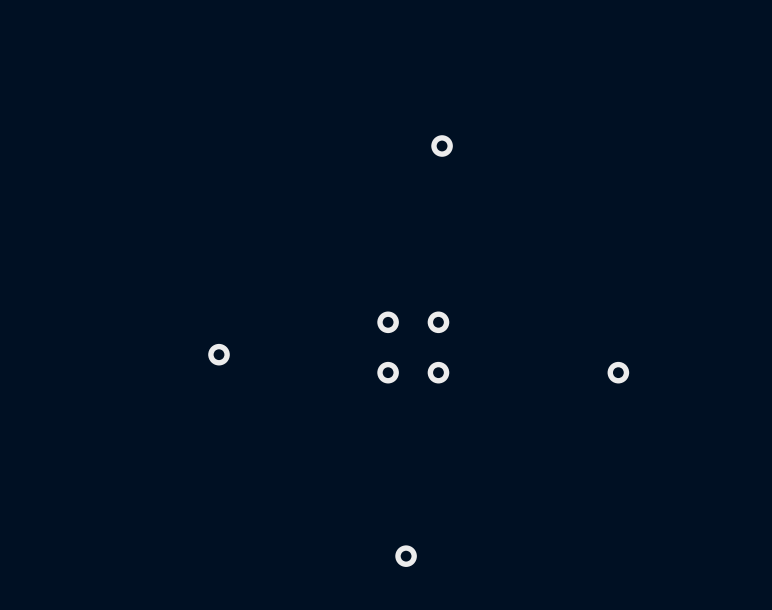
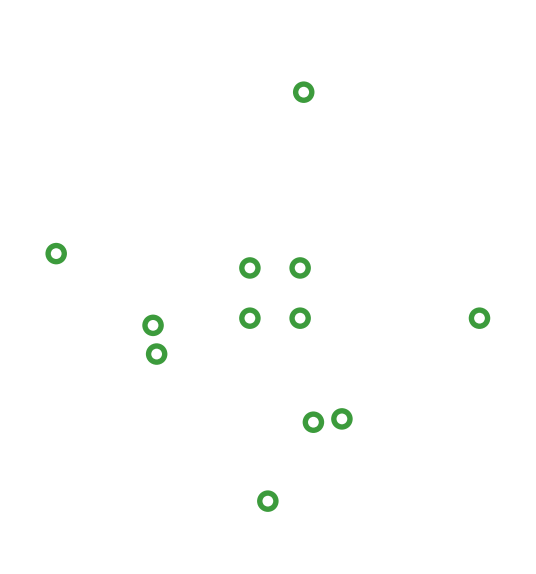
via: none -> (56, 253)
via: (219, 354) -> none
via: none -> (153, 325)
via: none -> (156, 354)
via: none -> (341, 418)
via: none -> (313, 422)

